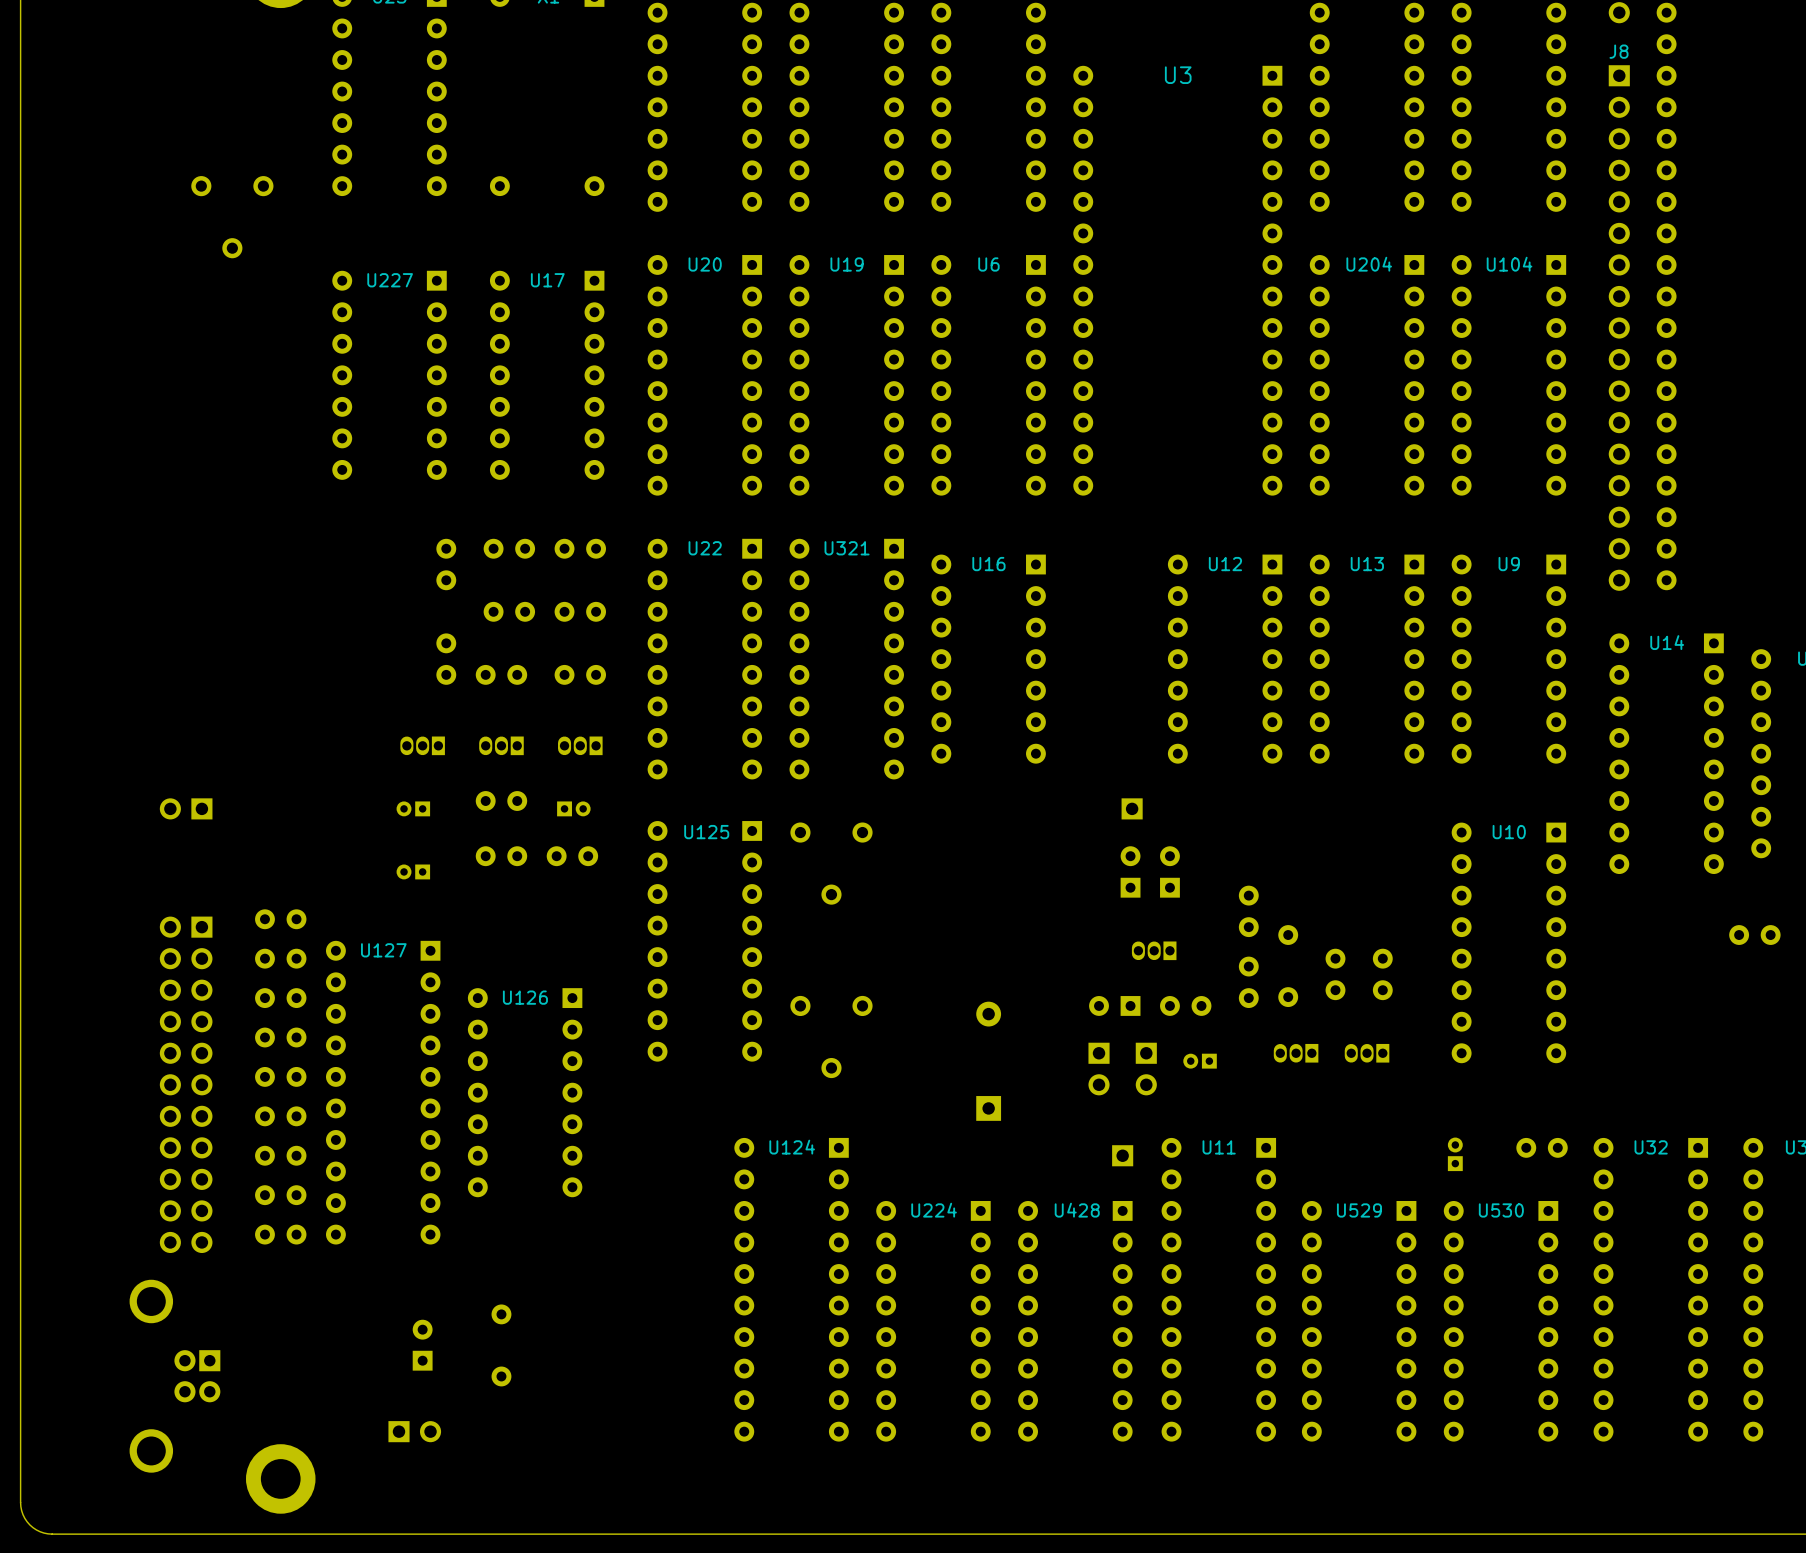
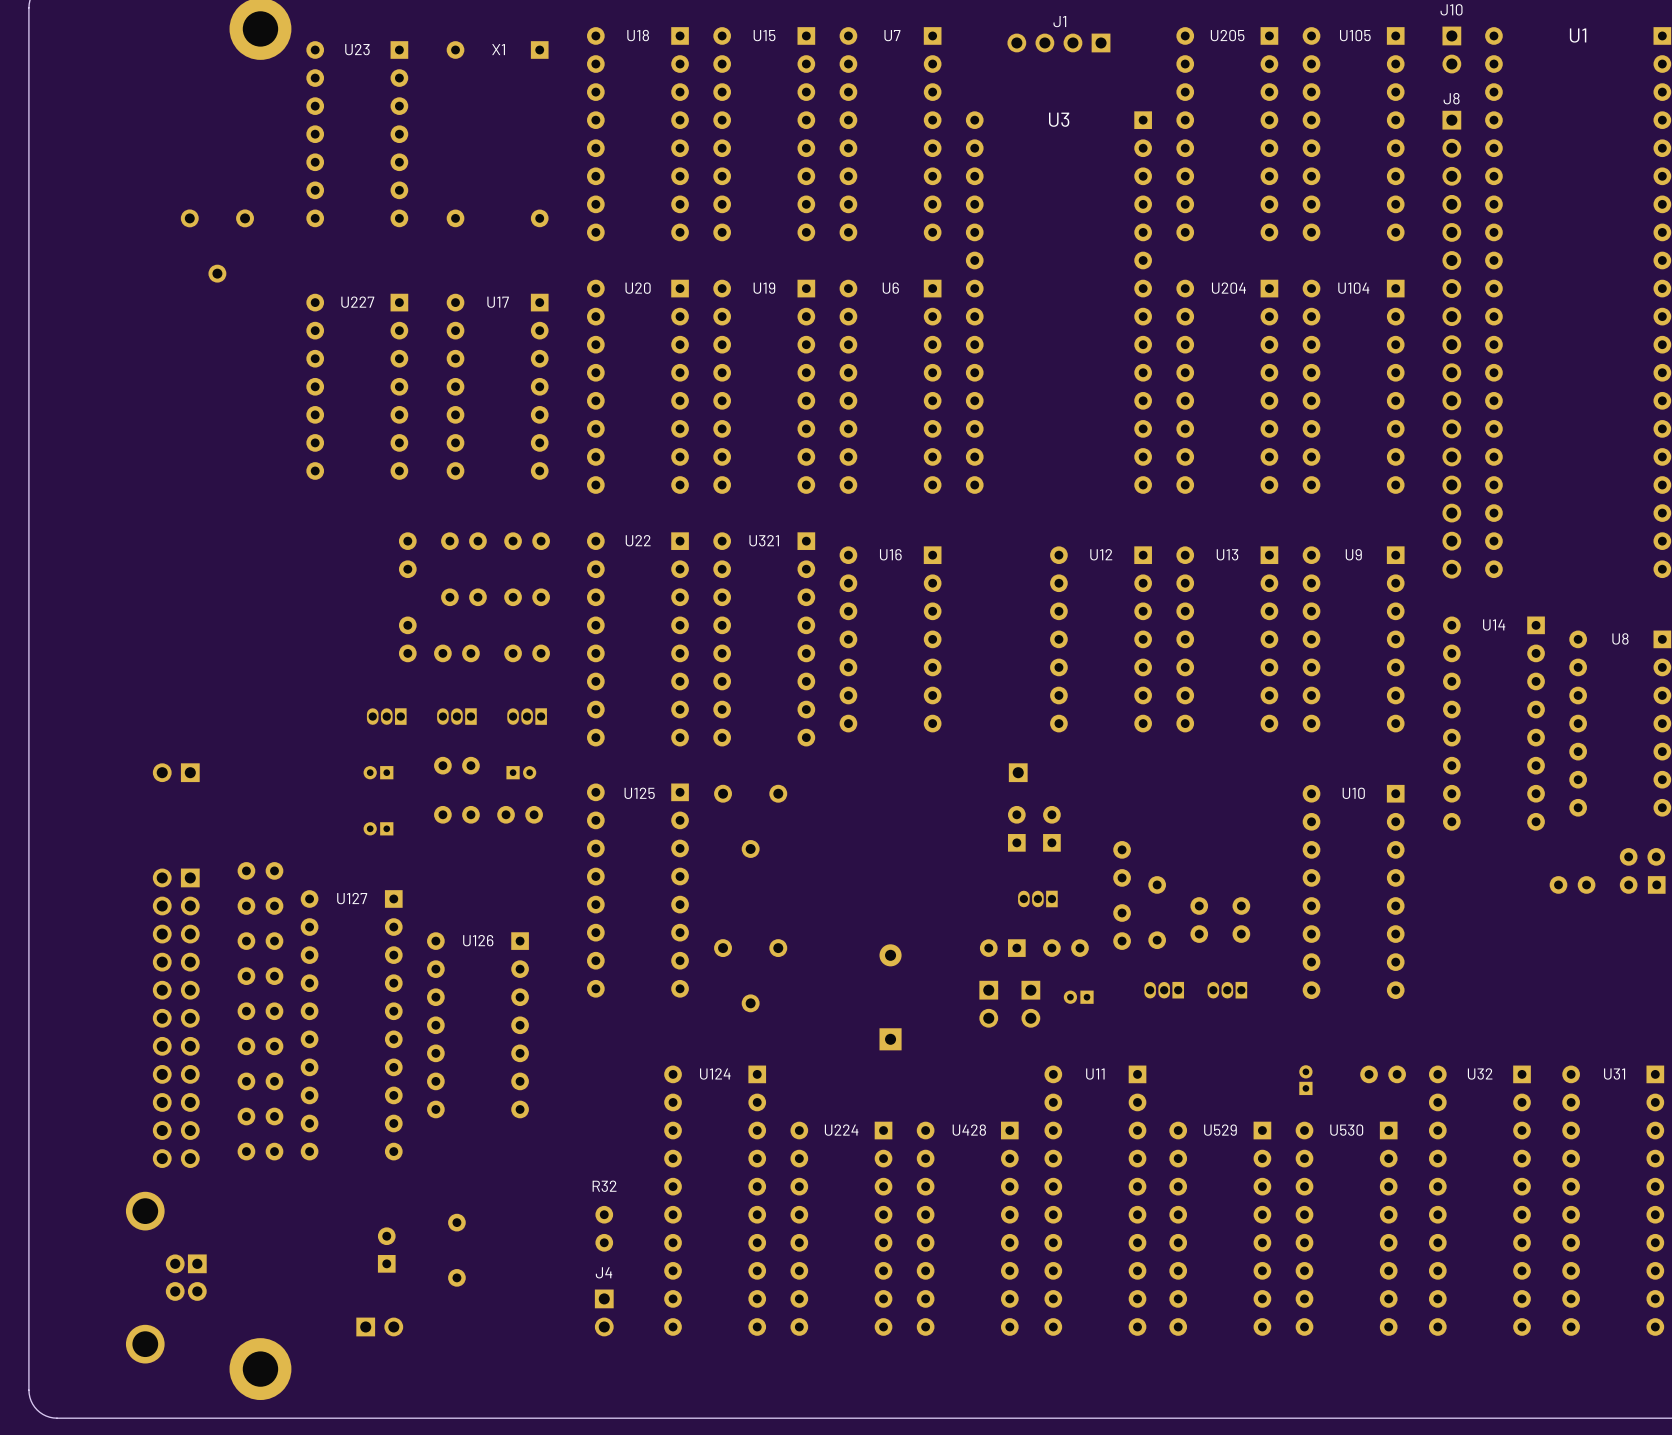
part: (1122, 1155) -> none
R32: none -> (604, 1228)
J4: none -> (604, 1312)

